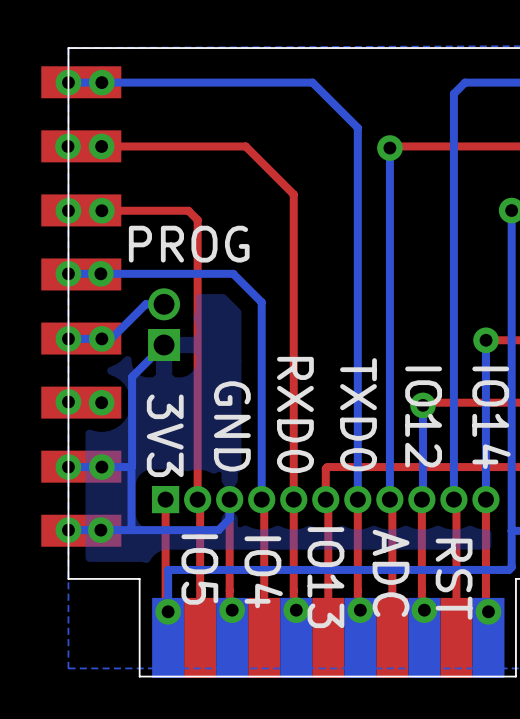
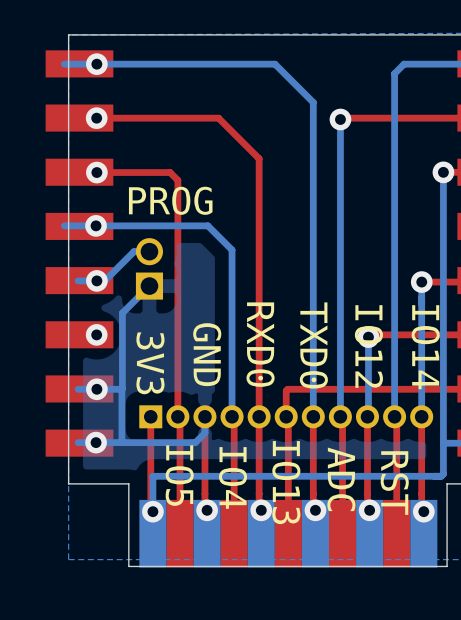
via: (68, 82) -> none
via: (68, 146) -> none
via: (68, 210) -> none
via: (68, 273) -> none
via: (68, 338) -> none
via: (68, 401) -> none
via: (68, 467) -> none
via: (68, 530) -> none

